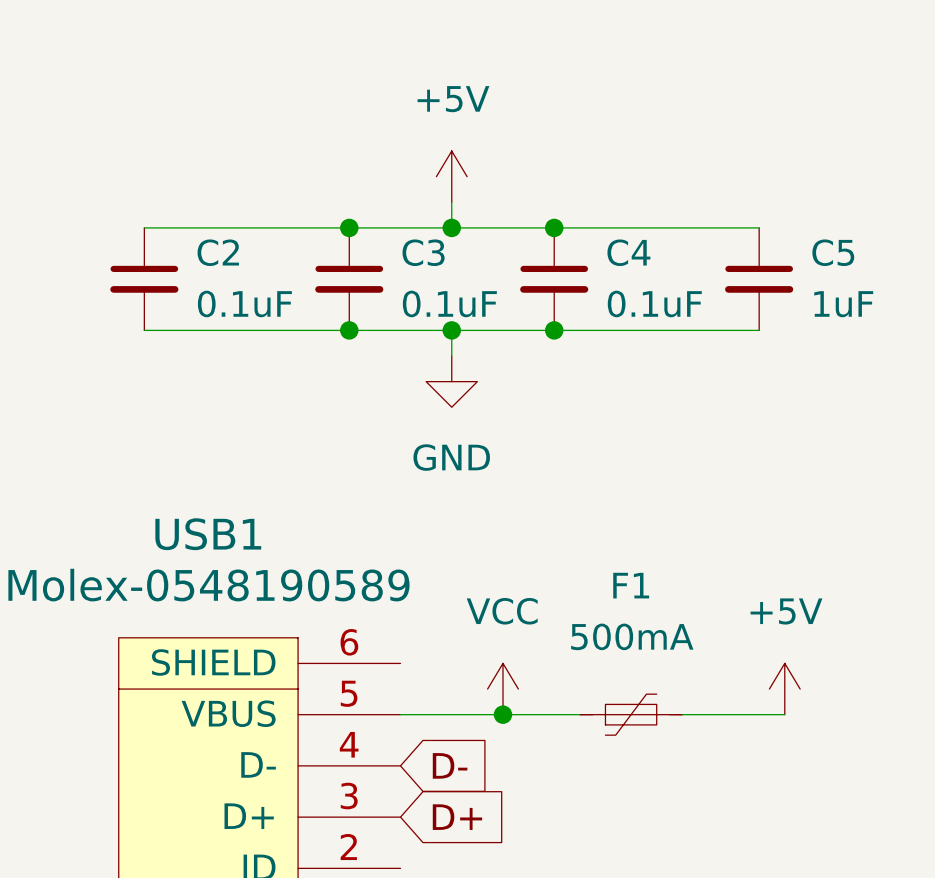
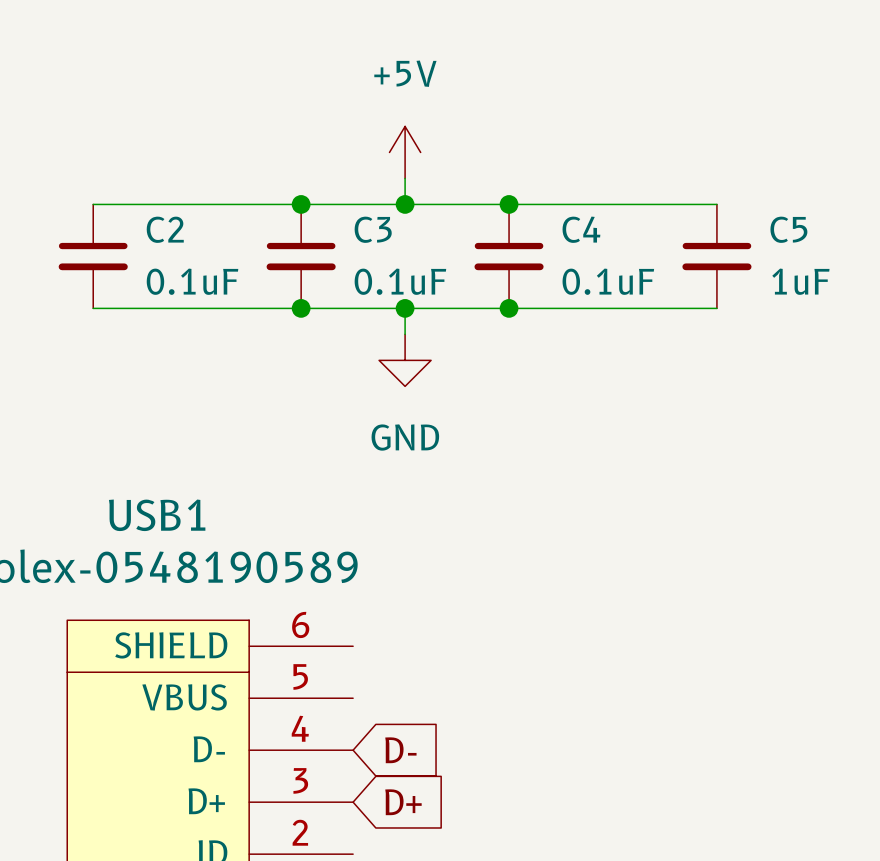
power symbol: VCC (502, 689) -> none
power symbol: +5V (784, 689) -> none
wire: (400, 714) (579, 714) -> none
junction: (502, 714) -> none
F1: 500mA (631, 714) -> none
wire: (682, 714) (784, 714) -> none

